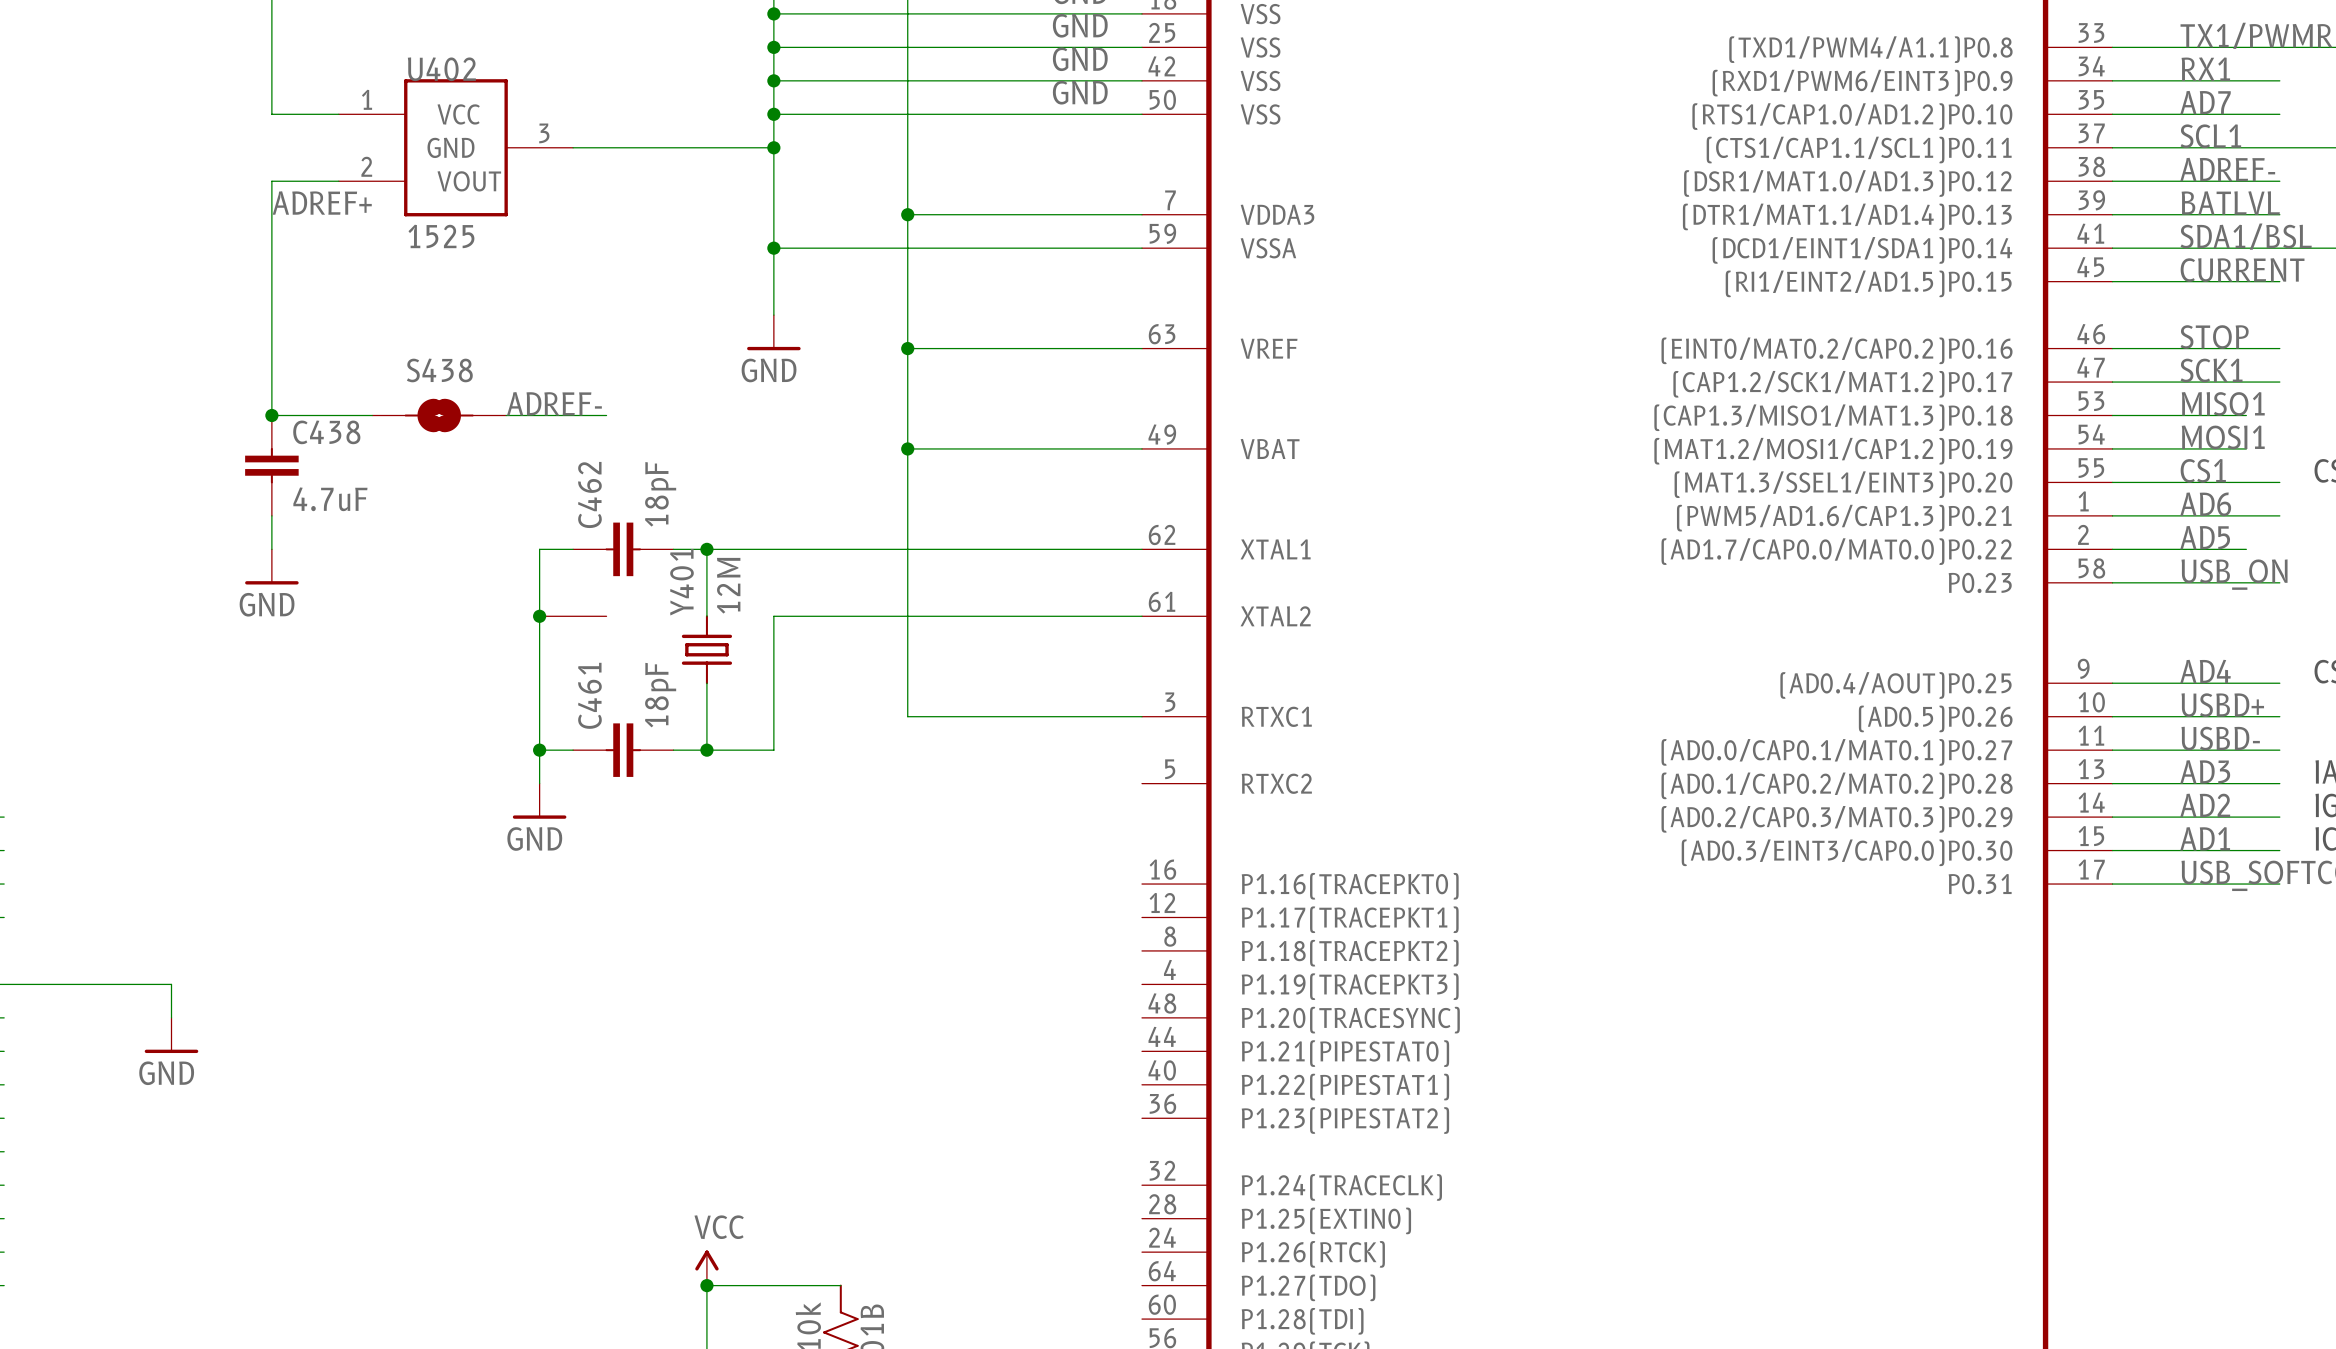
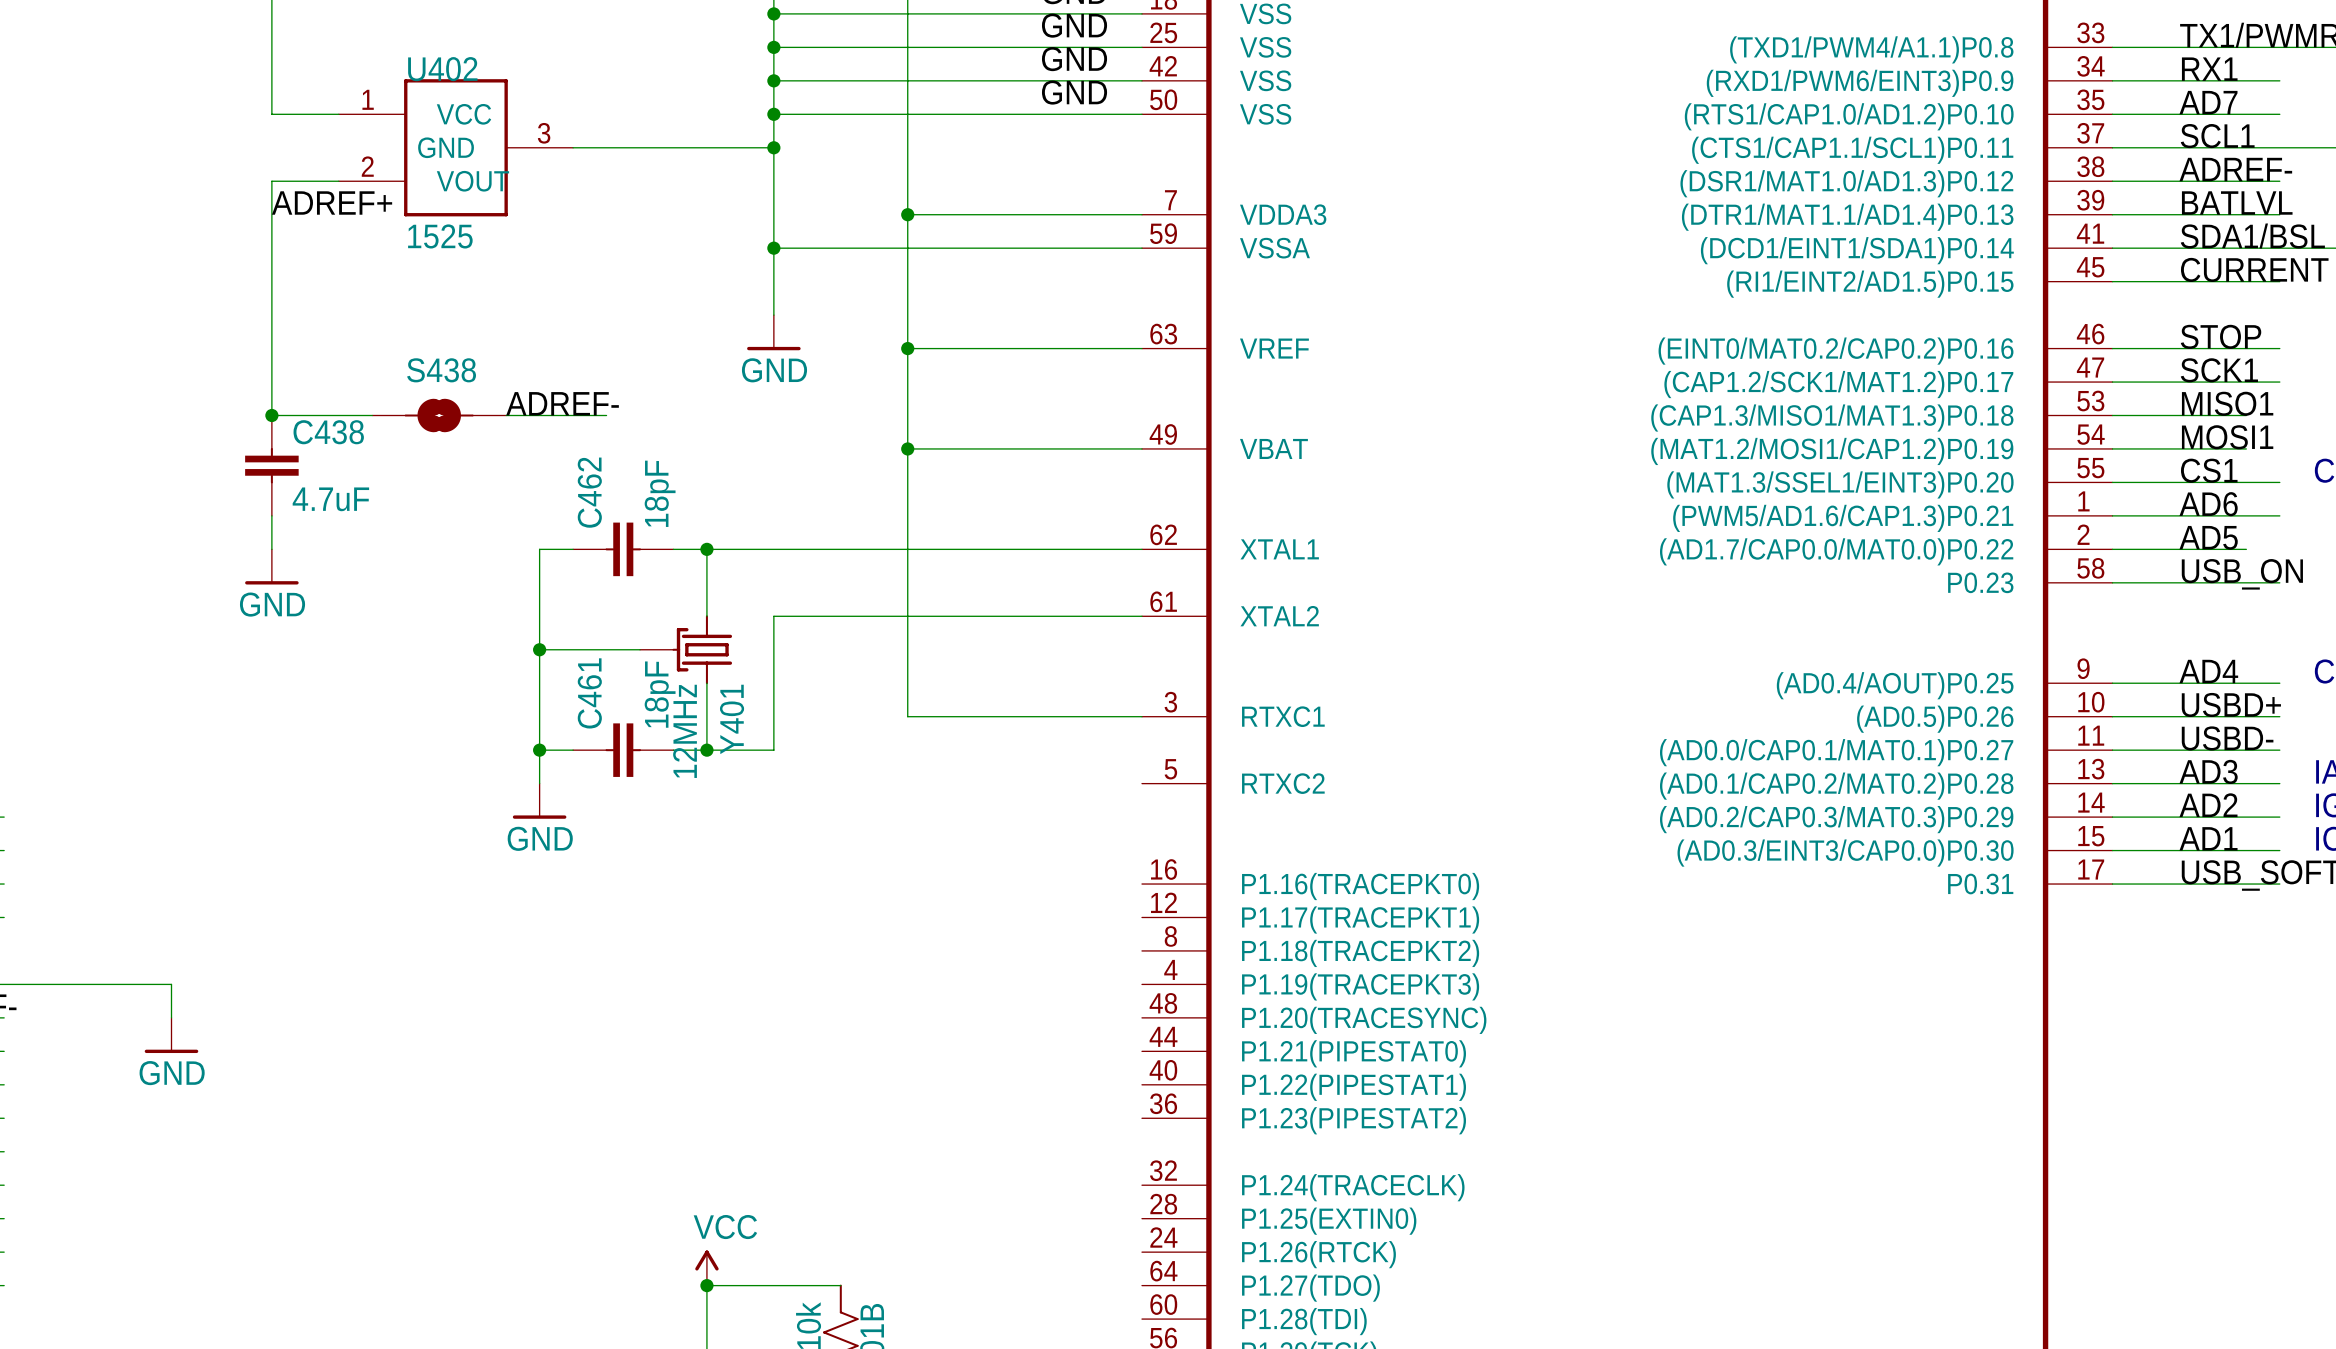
Y401 name position: Y401 (681, 582) -> Y401 (732, 719)
Y401 value: 12M (728, 585) -> 12MHz (685, 731)
Y401 symbol: [681, 615, 733, 685] -> [640, 615, 733, 685]
junction position: (539, 616) -> (539, 649)
part: (573, 616) -> none
wire: none -> (539, 649) (640, 649)

